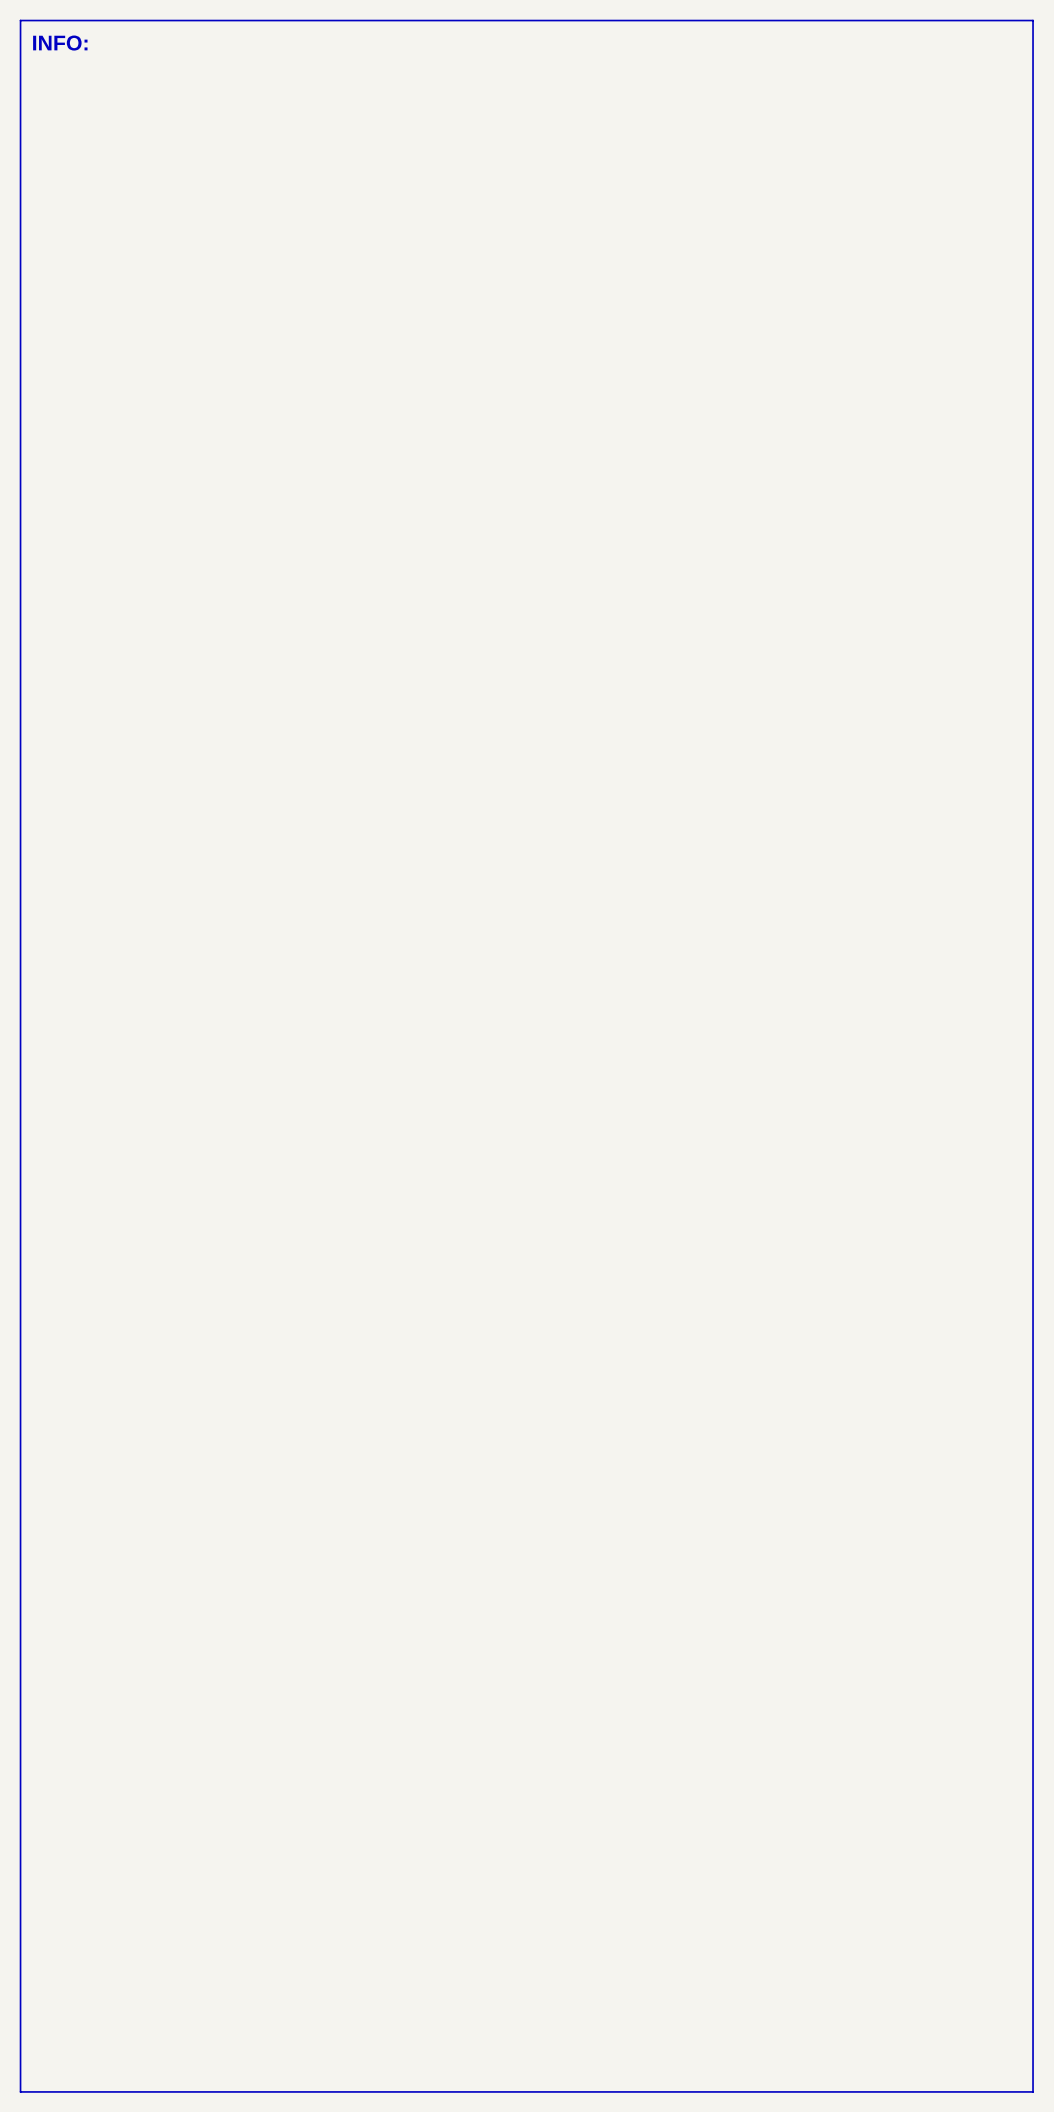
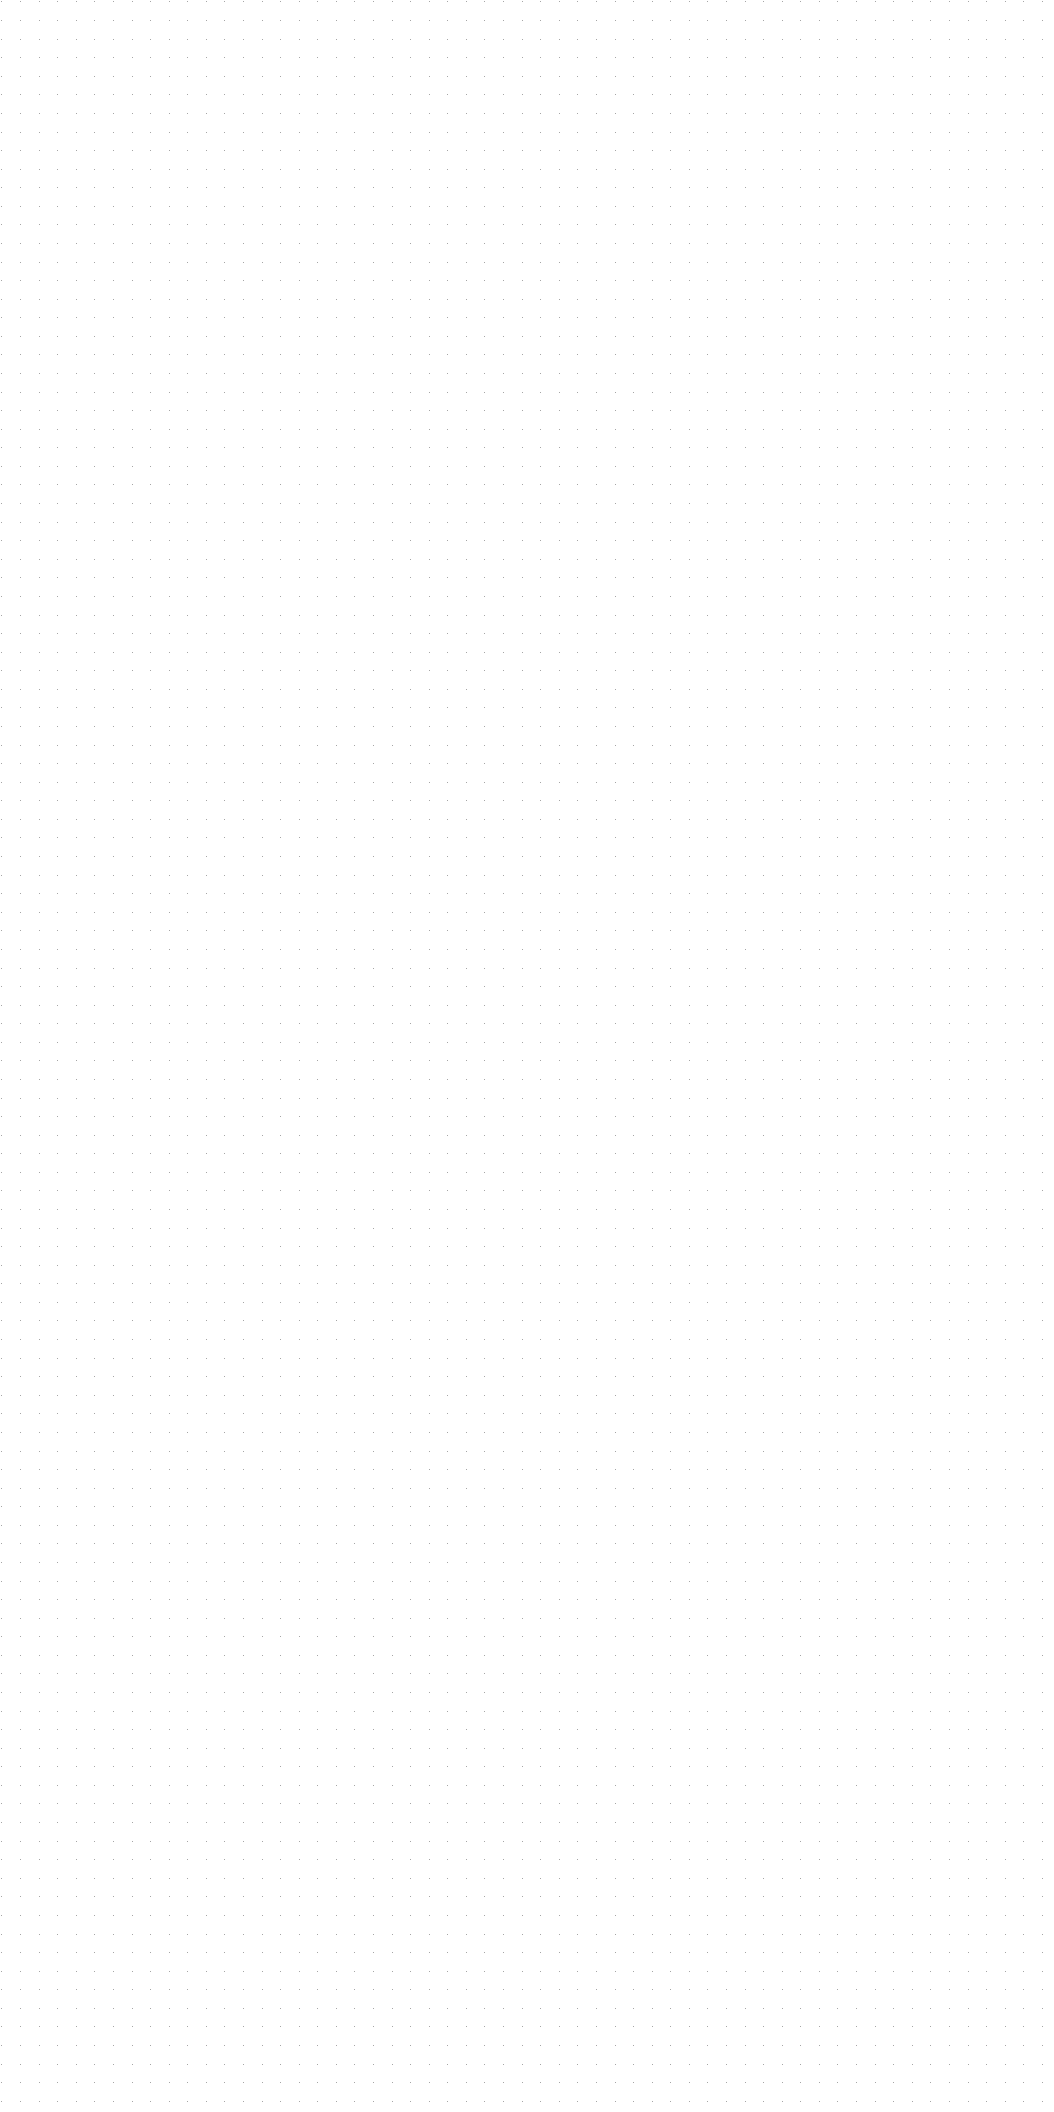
line: (20, 20) (1033, 20) (1033, 2091) (20, 2091) (20, 20) -> none
text: INFO: (60, 43) -> none

